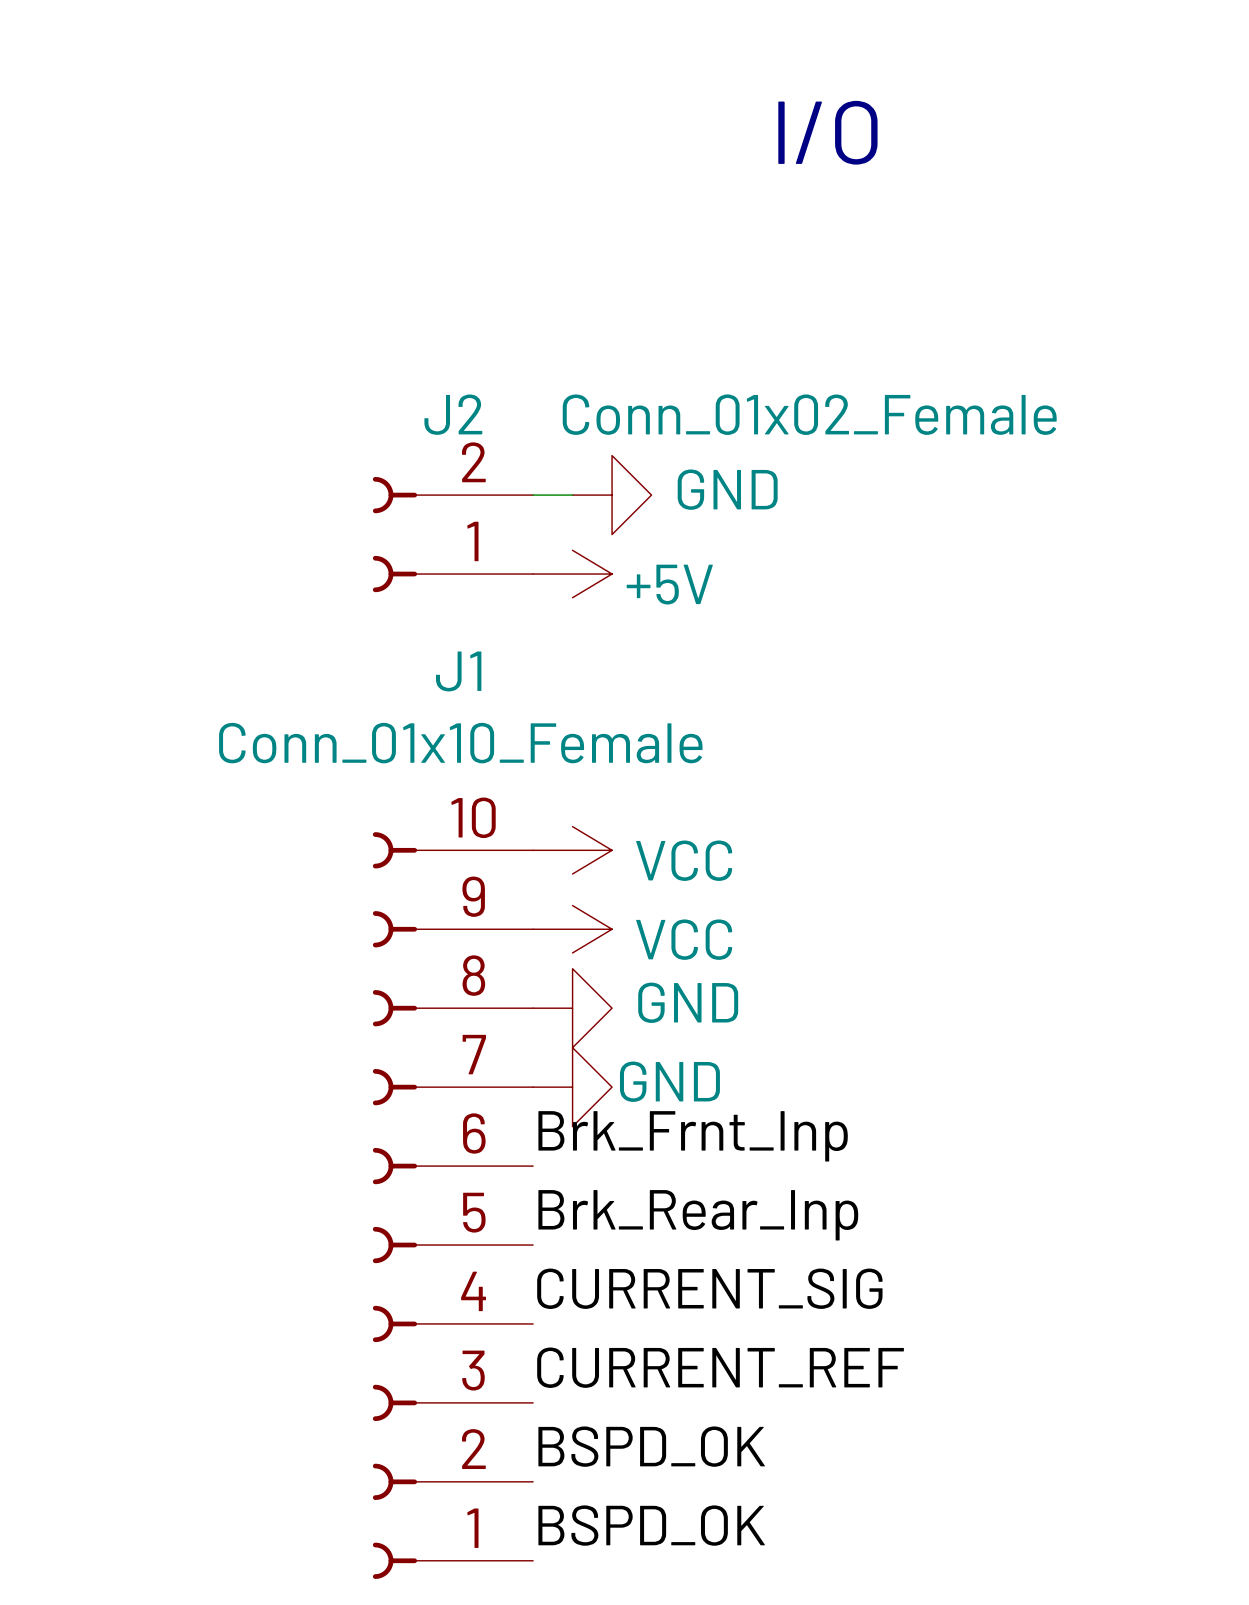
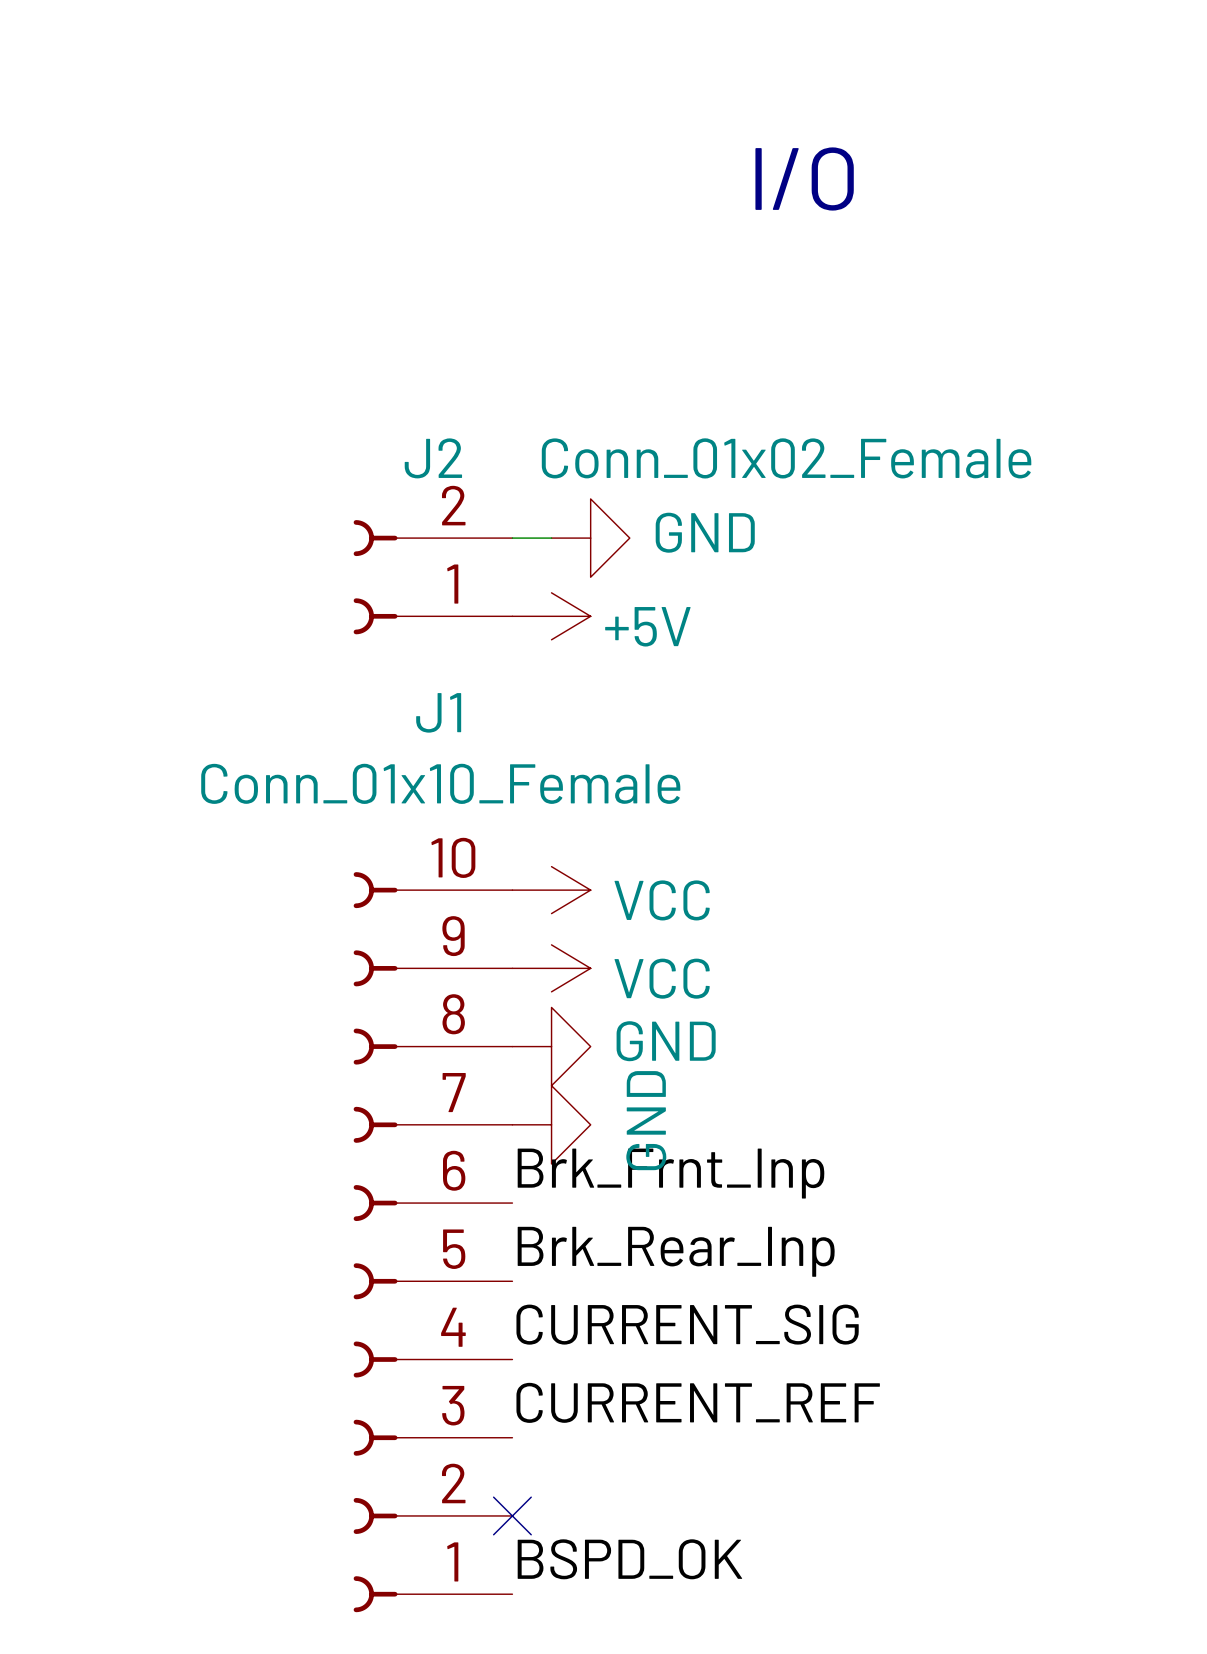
power symbol text rotation: 0° (669, 1081) -> 90° counterclockwise (646, 1120)
label: BSPD_OK (651, 1446) -> none
no-connect mark: none -> (512, 1515)

